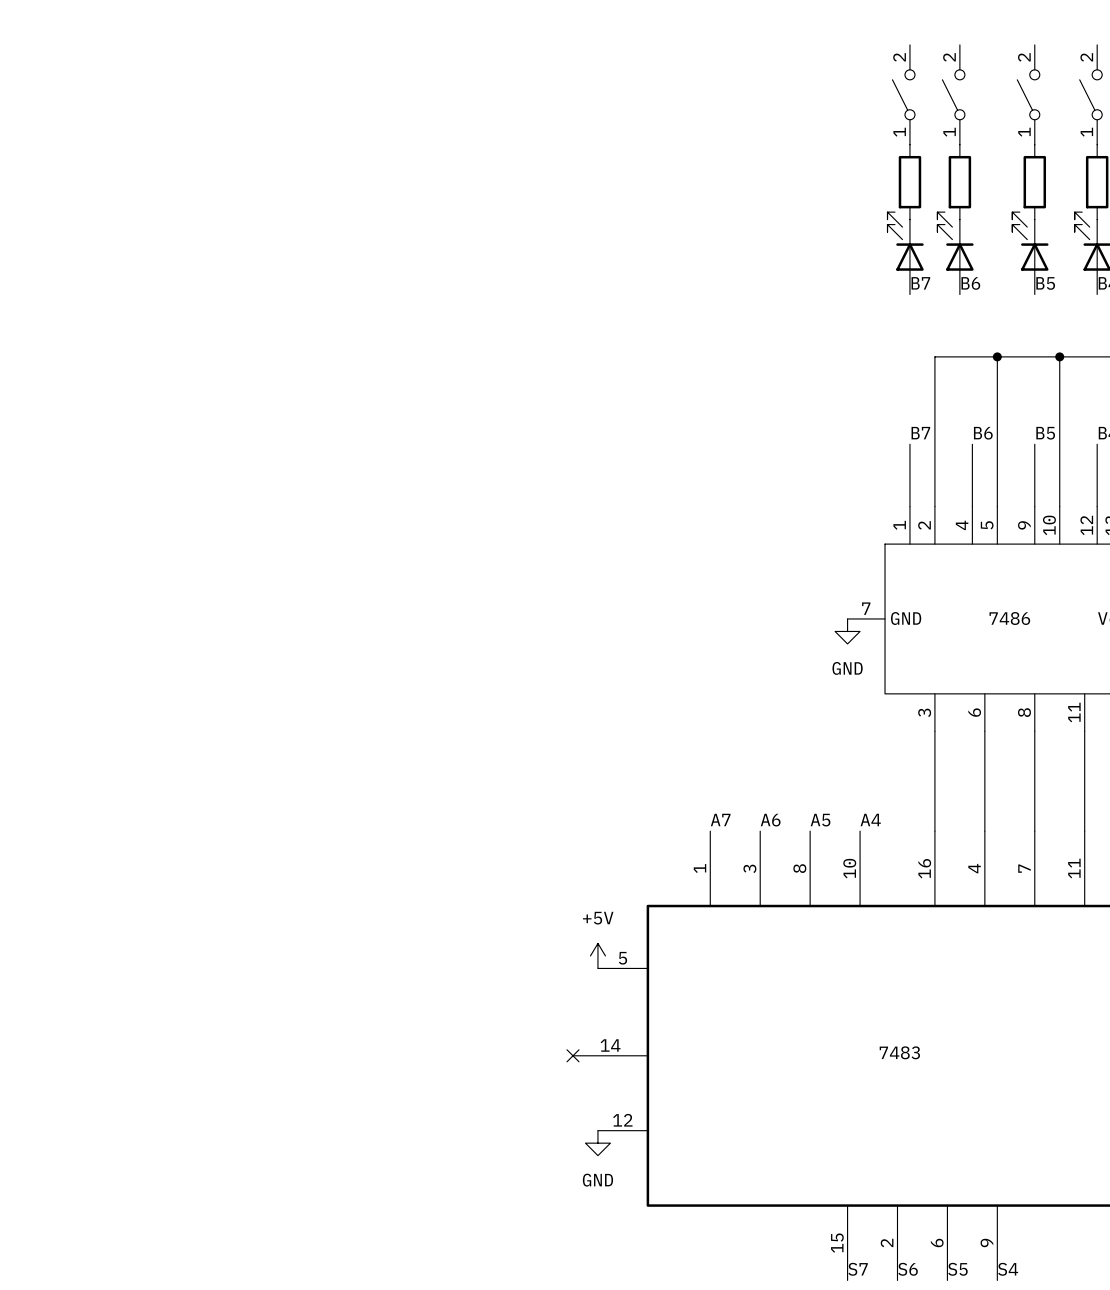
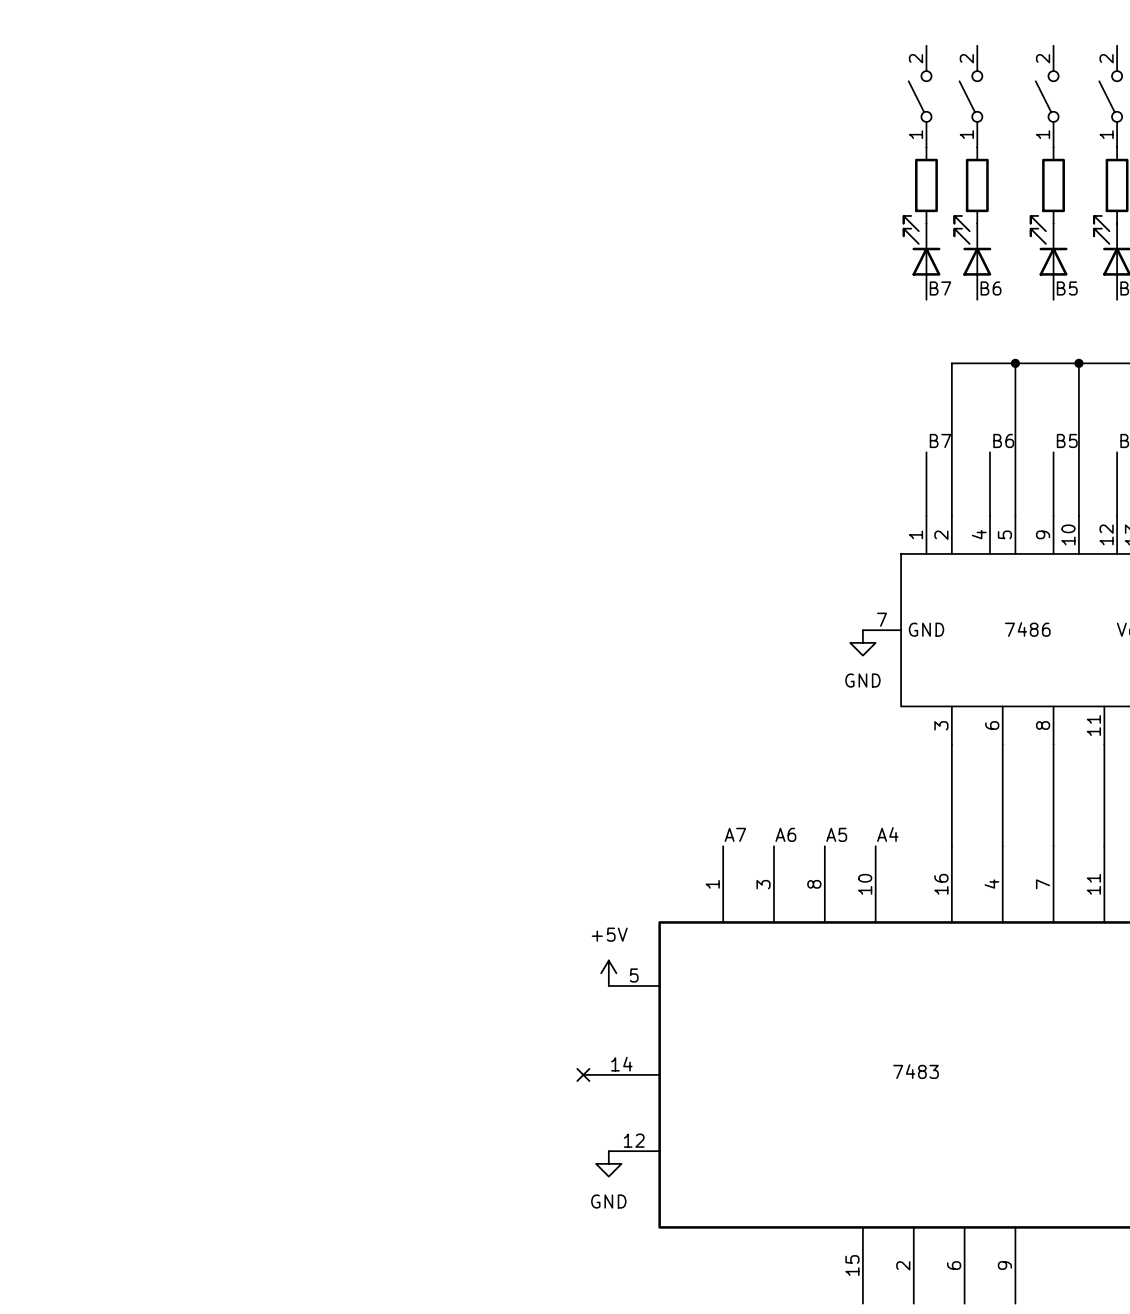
label: S7 (858, 1269) -> none
label: S6 (908, 1269) -> none
label: S5 (957, 1269) -> none
label: S4 (1008, 1269) -> none

